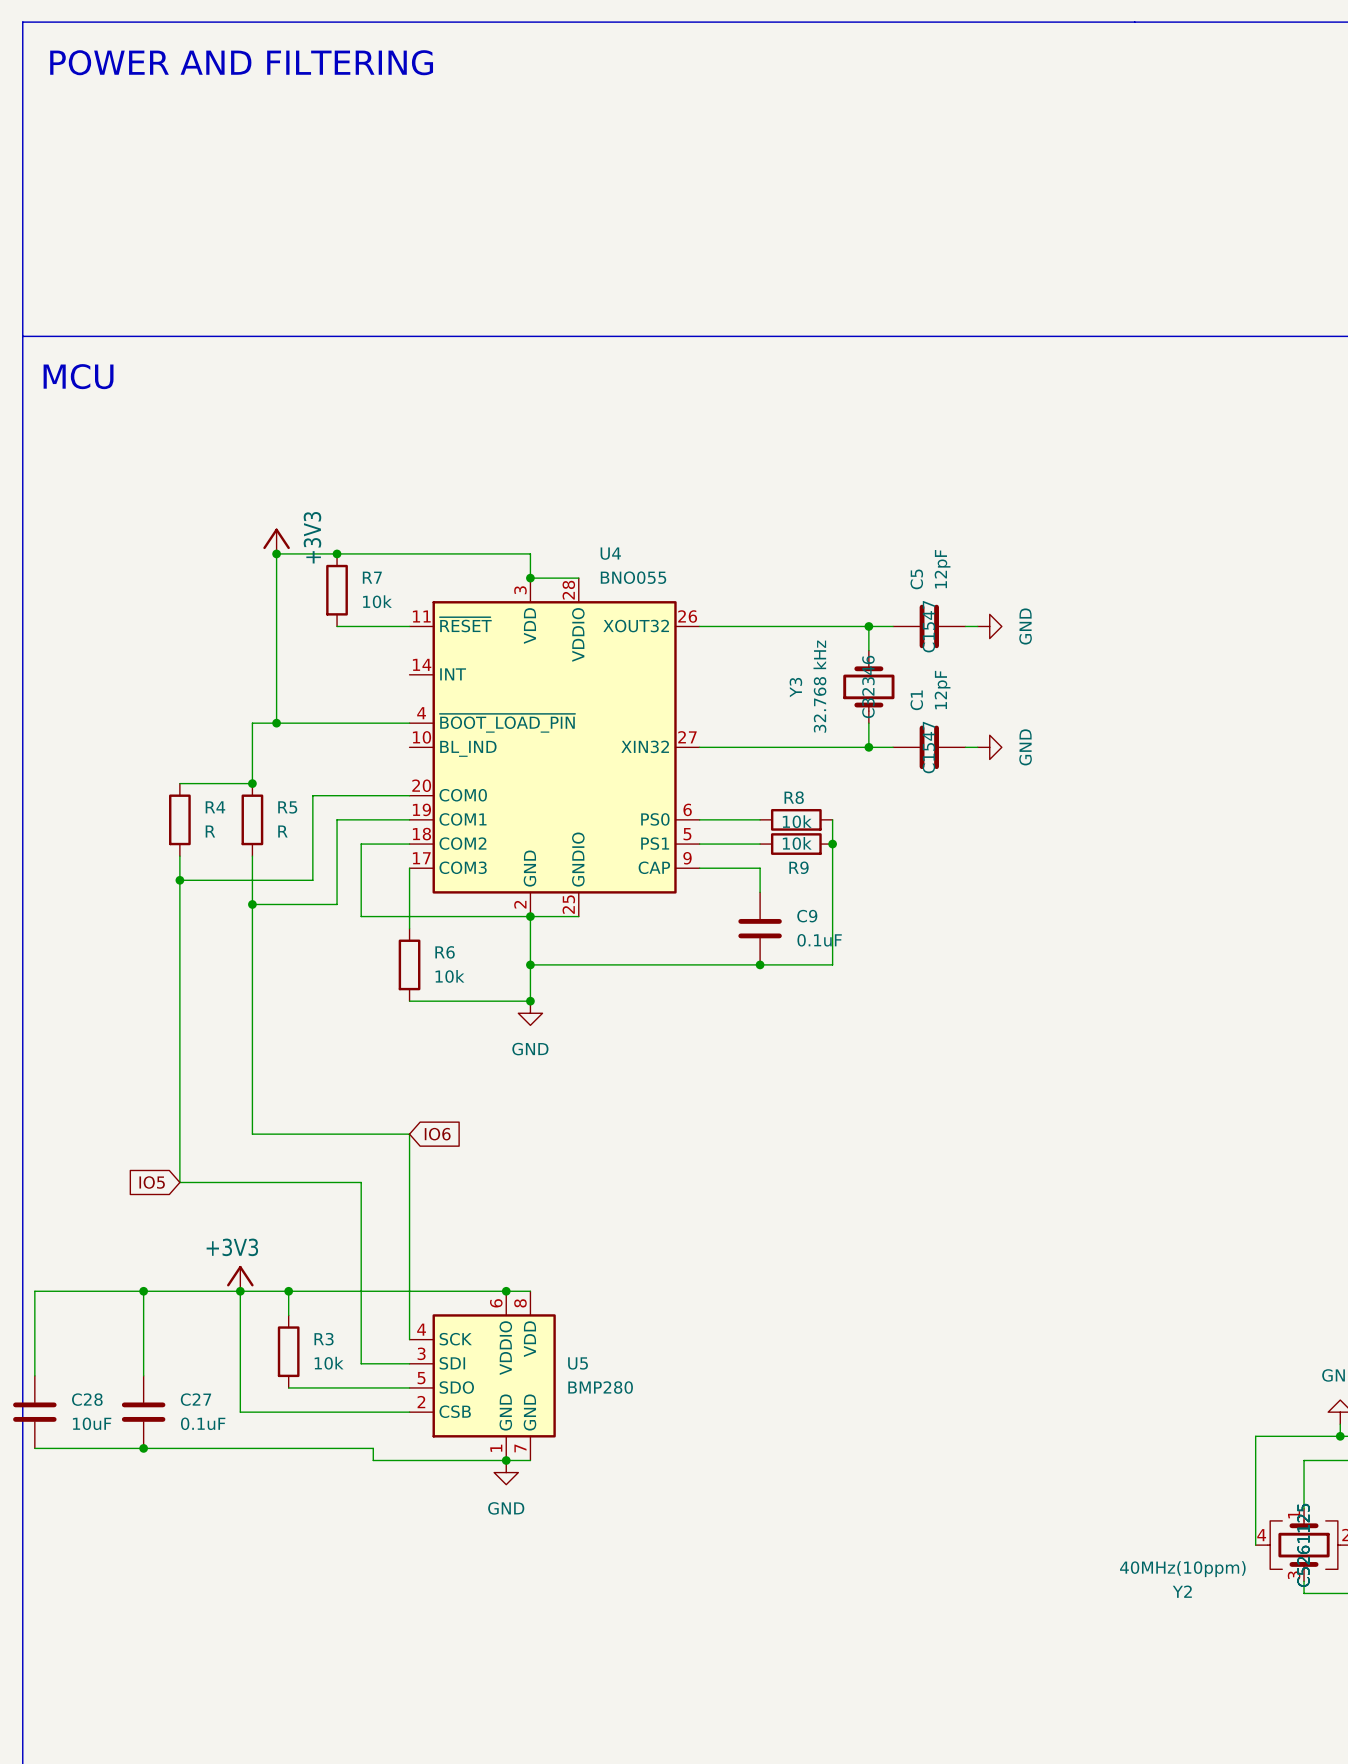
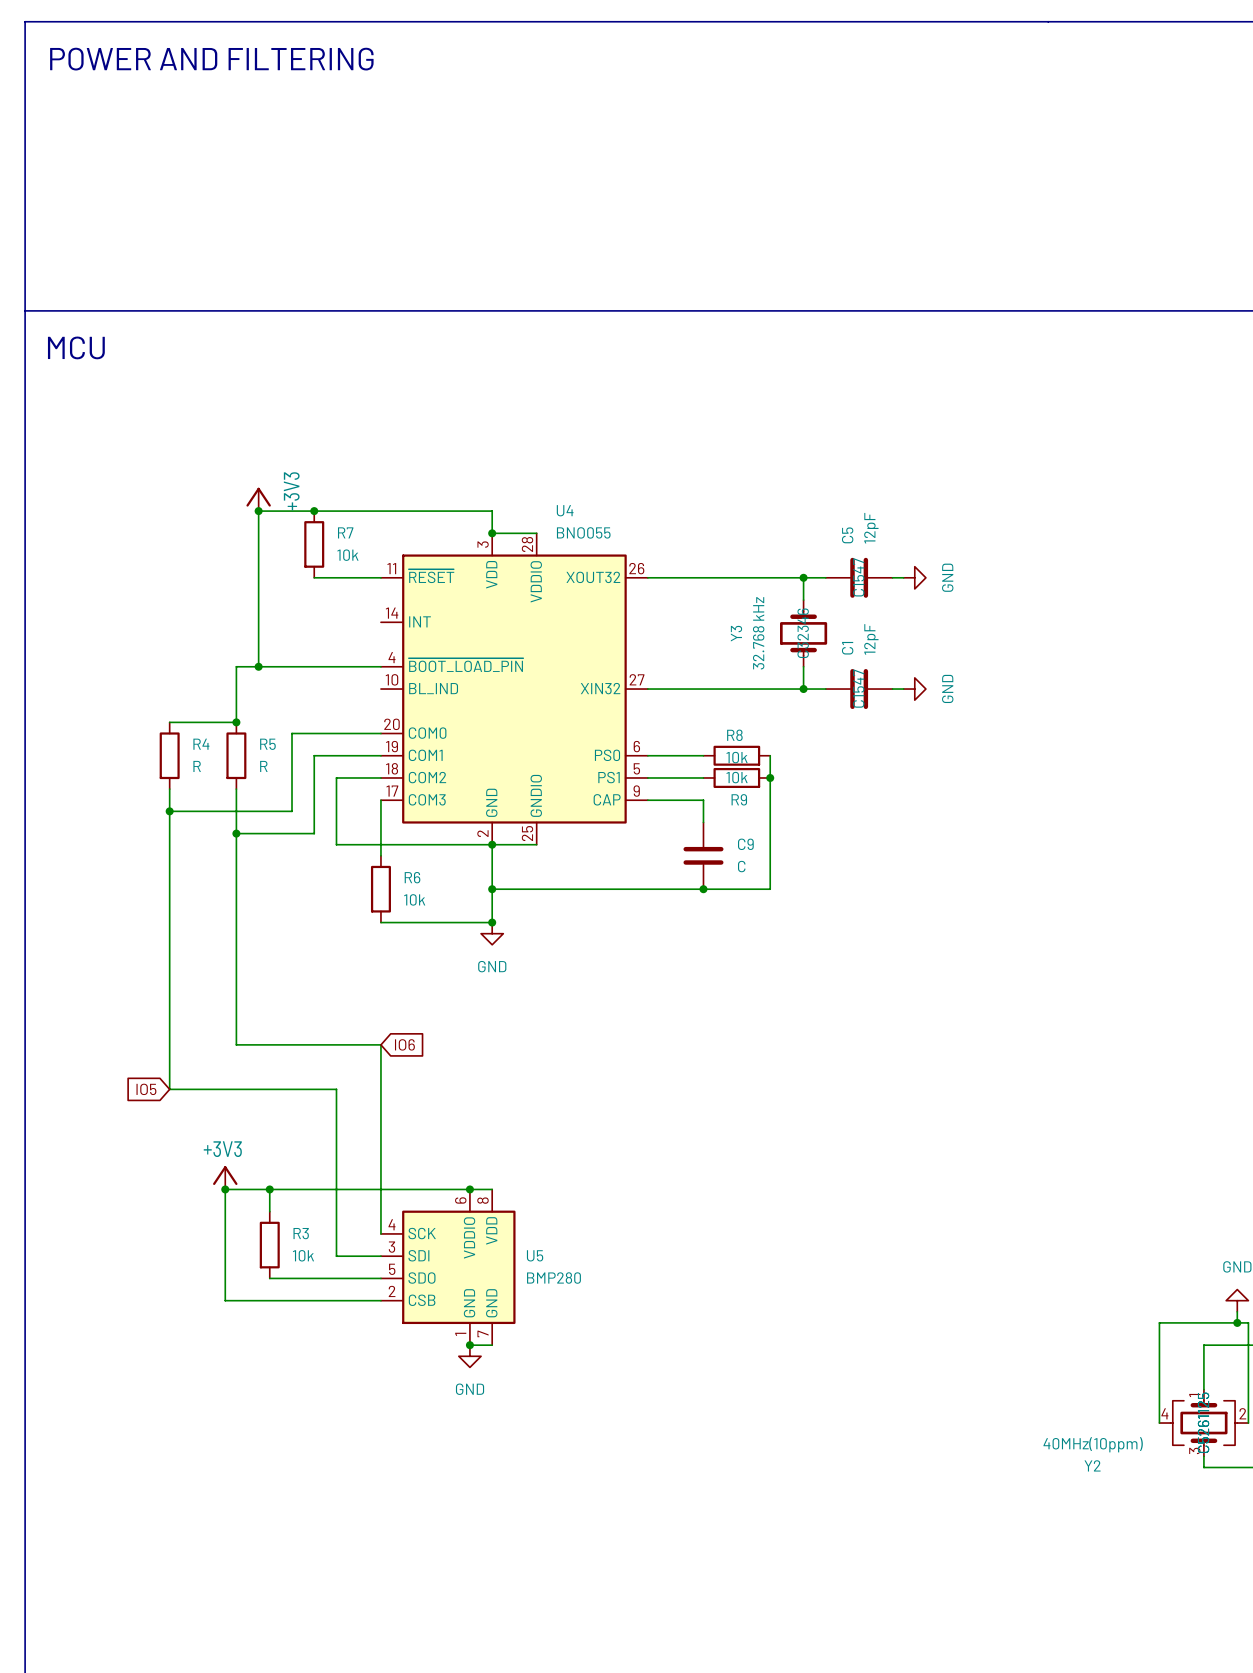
C9 value: 0.1uF (819, 940) -> C (741, 866)
wire: (143, 1291) (143, 1375) -> none
junction: (143, 1291) -> none
wire: (240, 1291) (34, 1291) (34, 1375) -> none
C28: 10uF (34, 1412) -> none
C27: 0.1uF (143, 1412) -> none
wire: (34, 1448) (373, 1448) (373, 1460) (506, 1460) -> none
junction: (143, 1448) -> none

